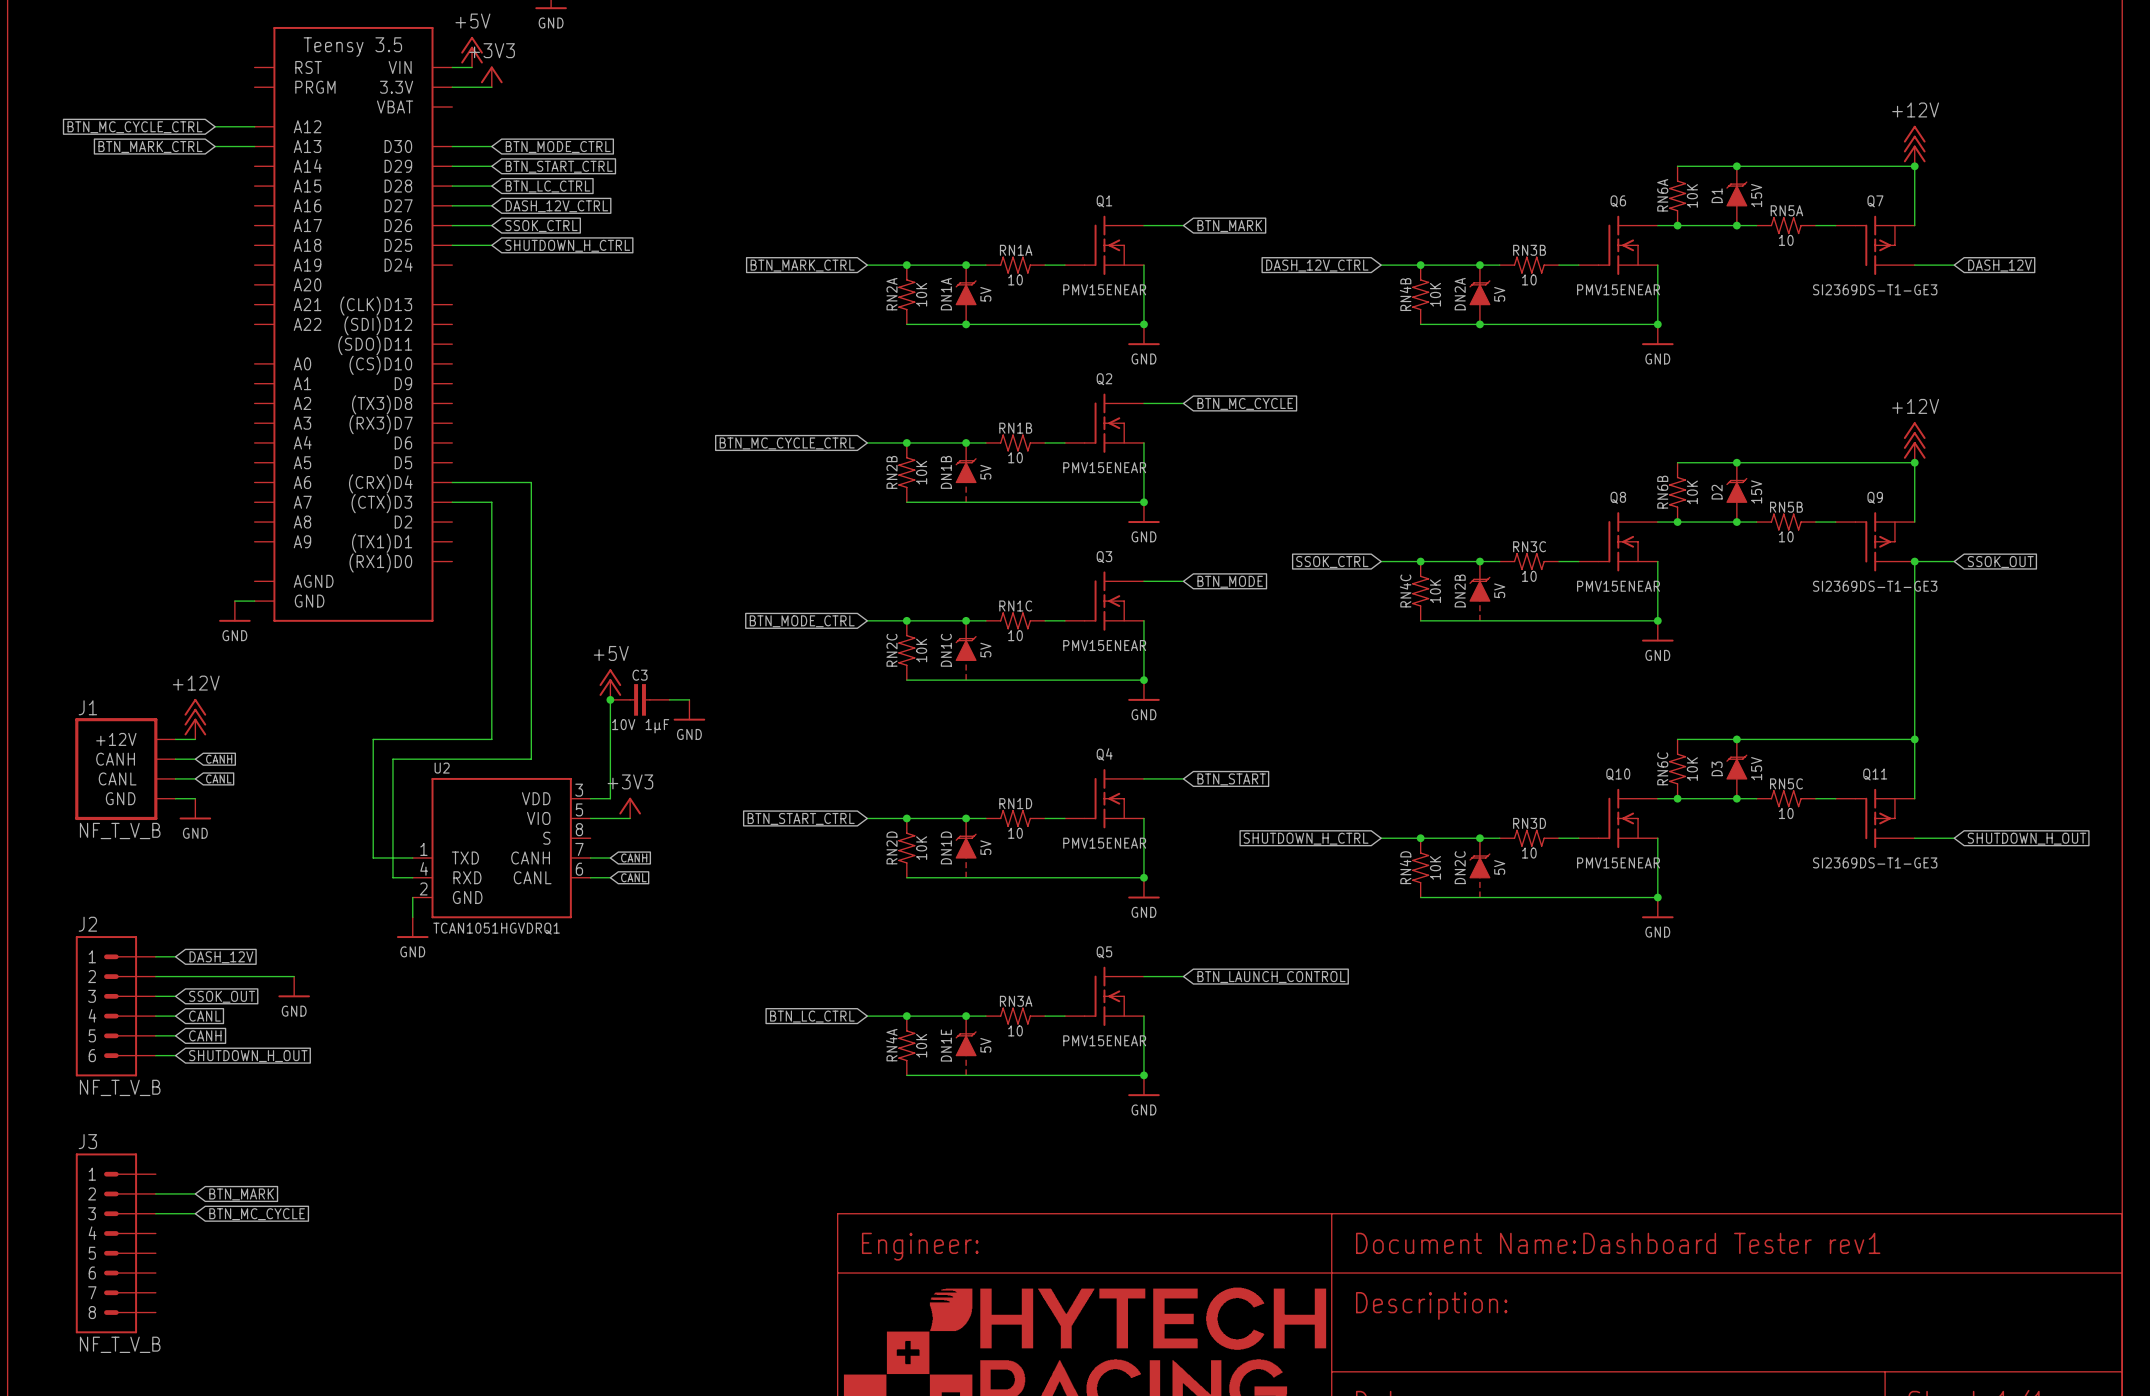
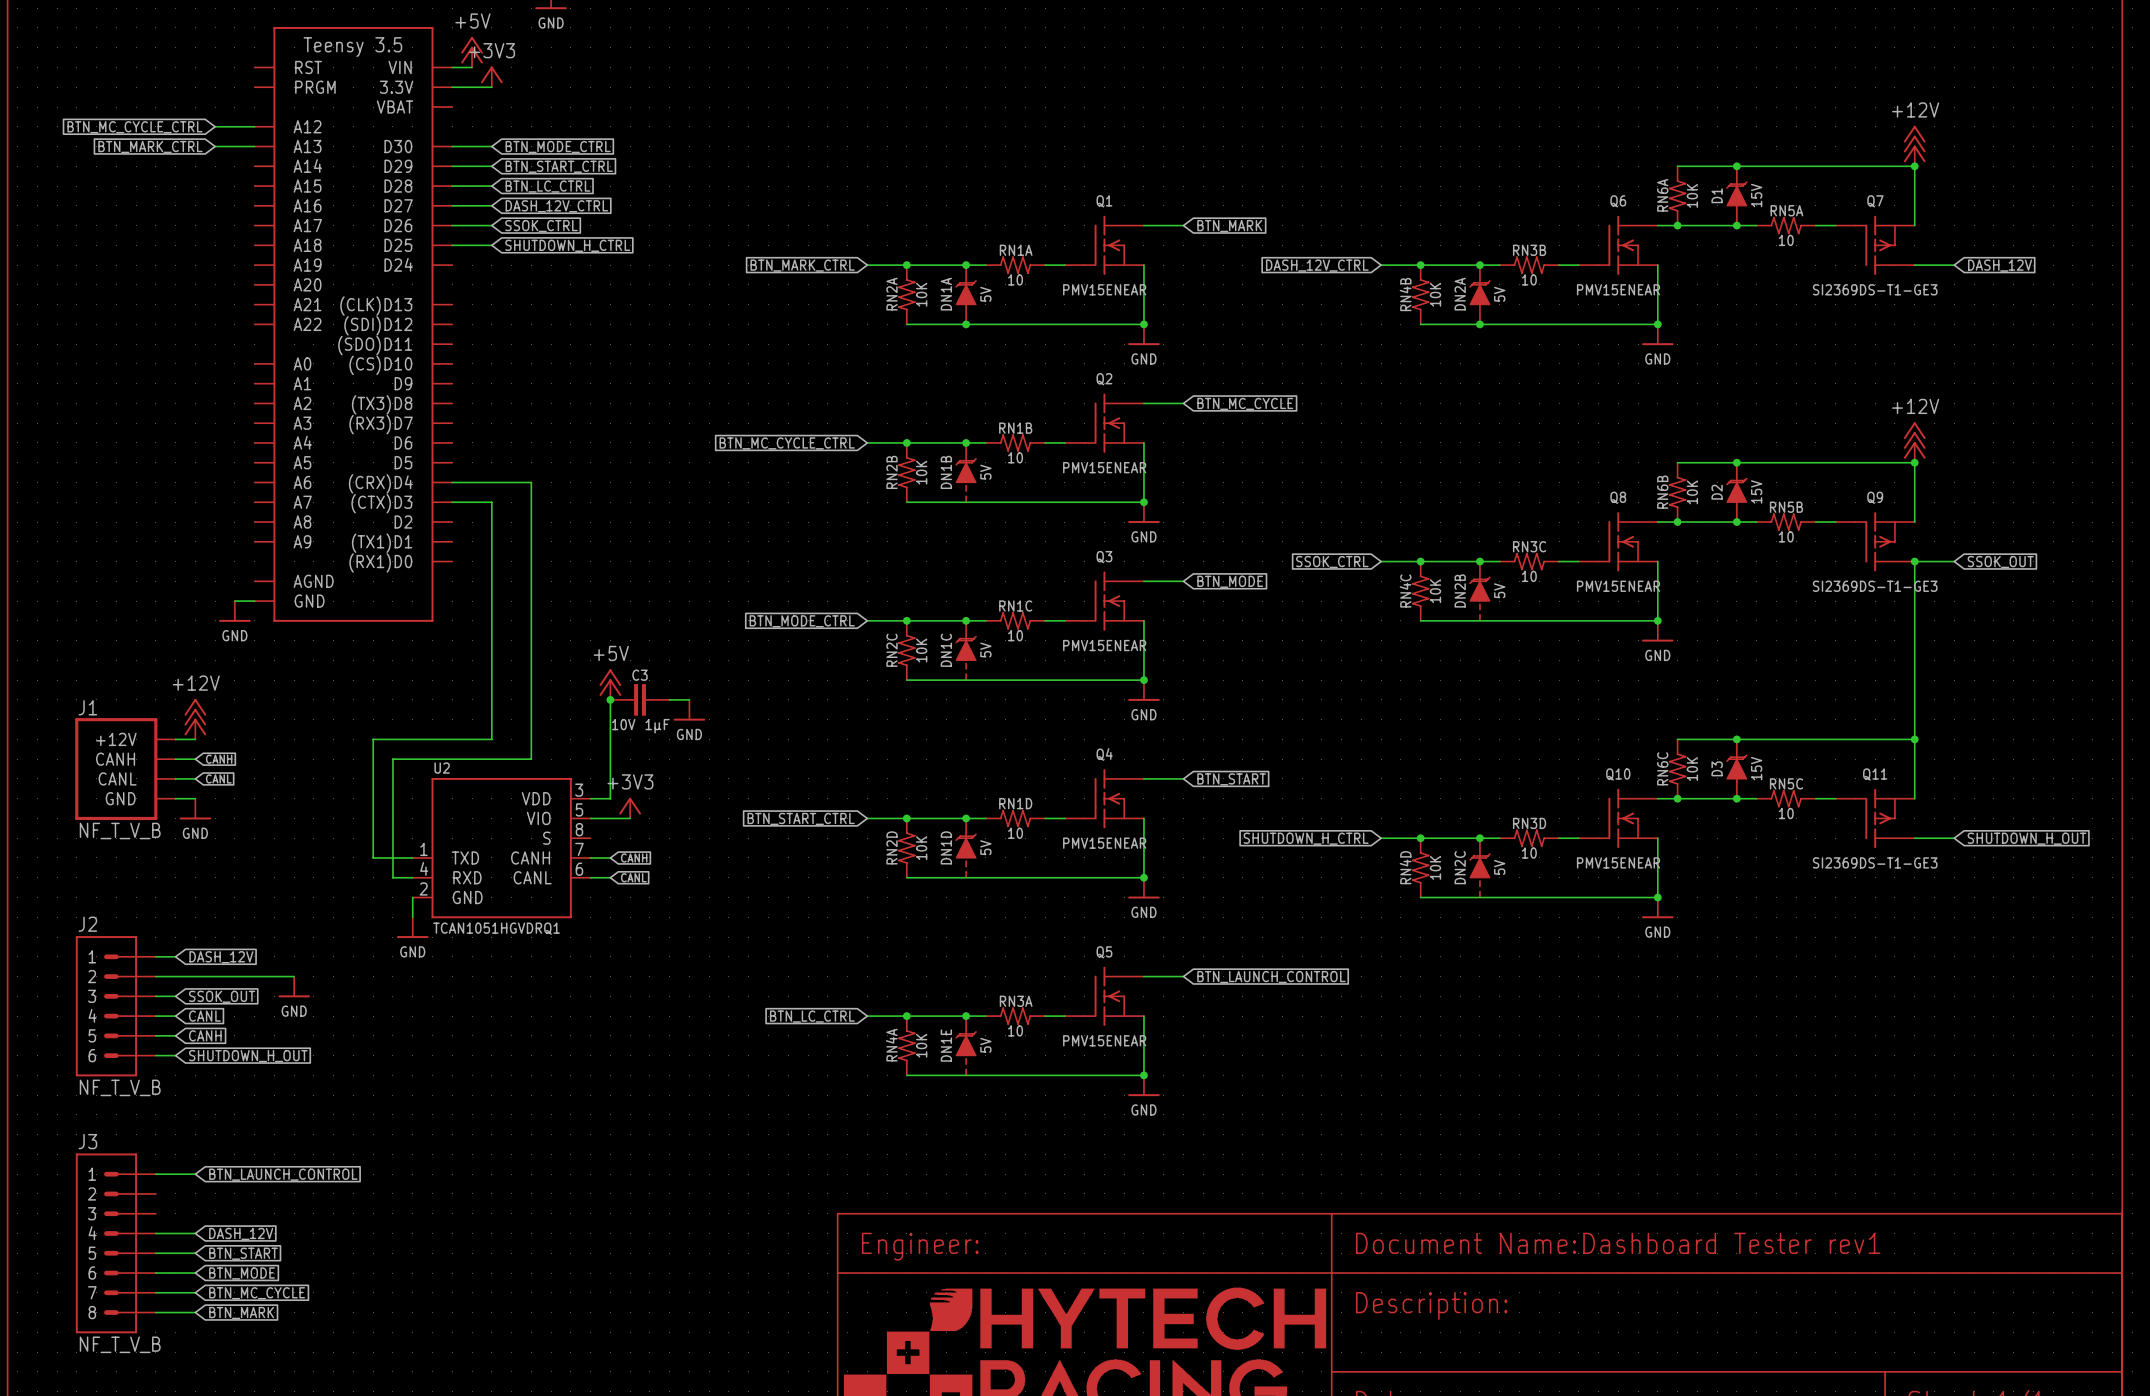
wire: none -> (155, 1174) (195, 1174)
global label: none -> BTN_LAUNCH_CONTROL (283, 1174)
wire: (155, 1193) (195, 1193) -> (155, 1233) (195, 1233)
global label position: BTN_MARK (241, 1194) -> BTN_MARK (241, 1313)
wire: (155, 1213) (195, 1213) -> (155, 1253) (195, 1253)
global label position: BTN_MC_CYCLE (257, 1214) -> BTN_MC_CYCLE (257, 1293)
global label: none -> DASH_12V (241, 1233)
global label: none -> BTN_START (243, 1253)
wire: none -> (155, 1273) (195, 1273)
global label: none -> BTN_MODE (242, 1273)
wire: none -> (155, 1292) (195, 1292)
wire: none -> (155, 1312) (195, 1312)

